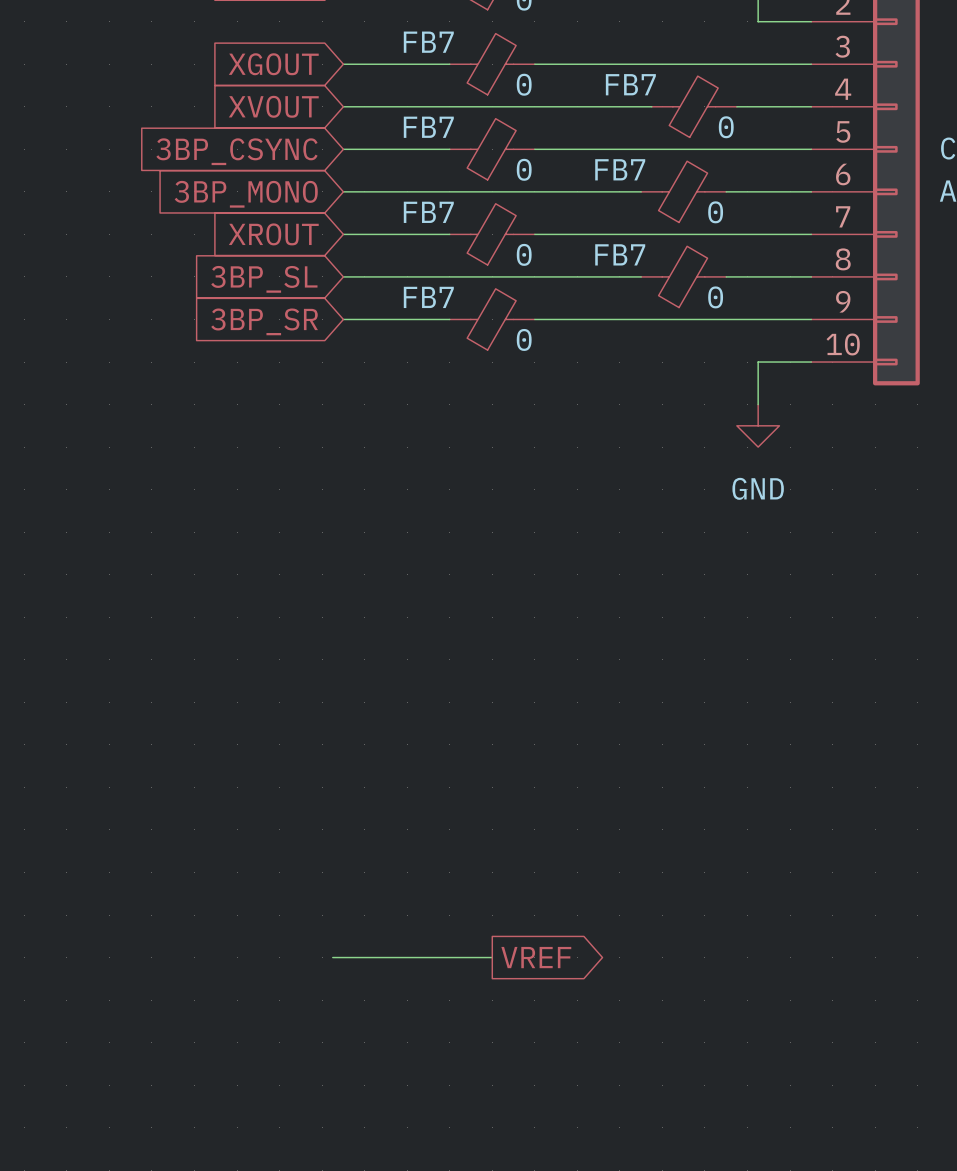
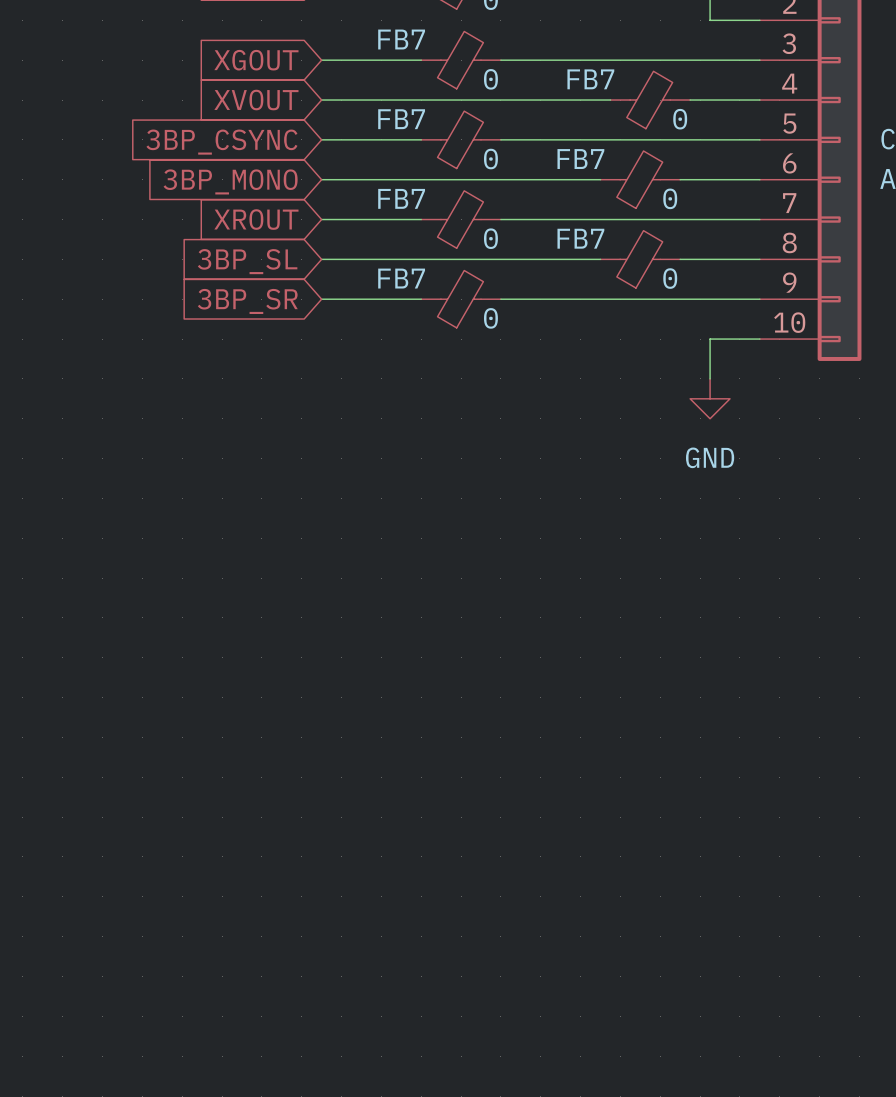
wire: (332, 957) (492, 957) -> none
global label: VREF (536, 957) -> none

